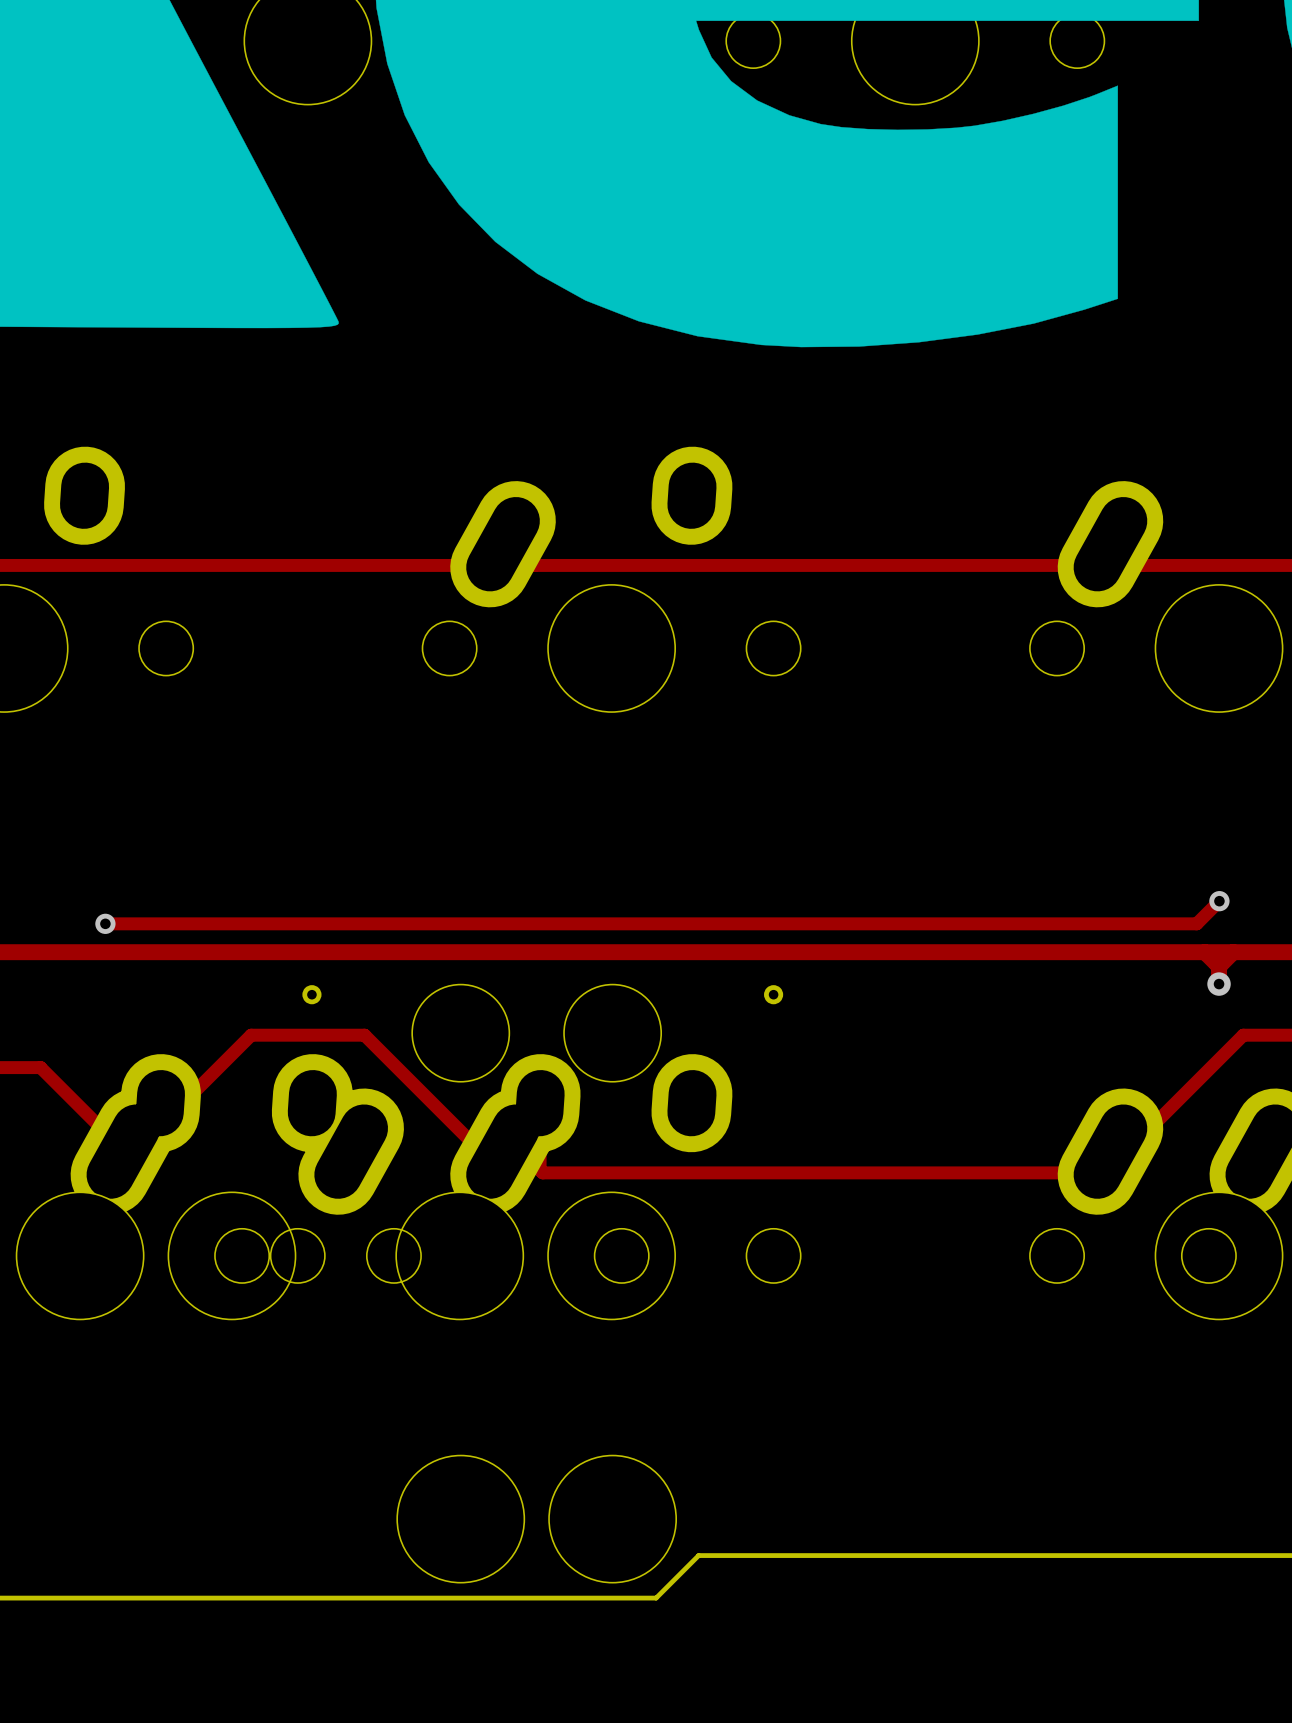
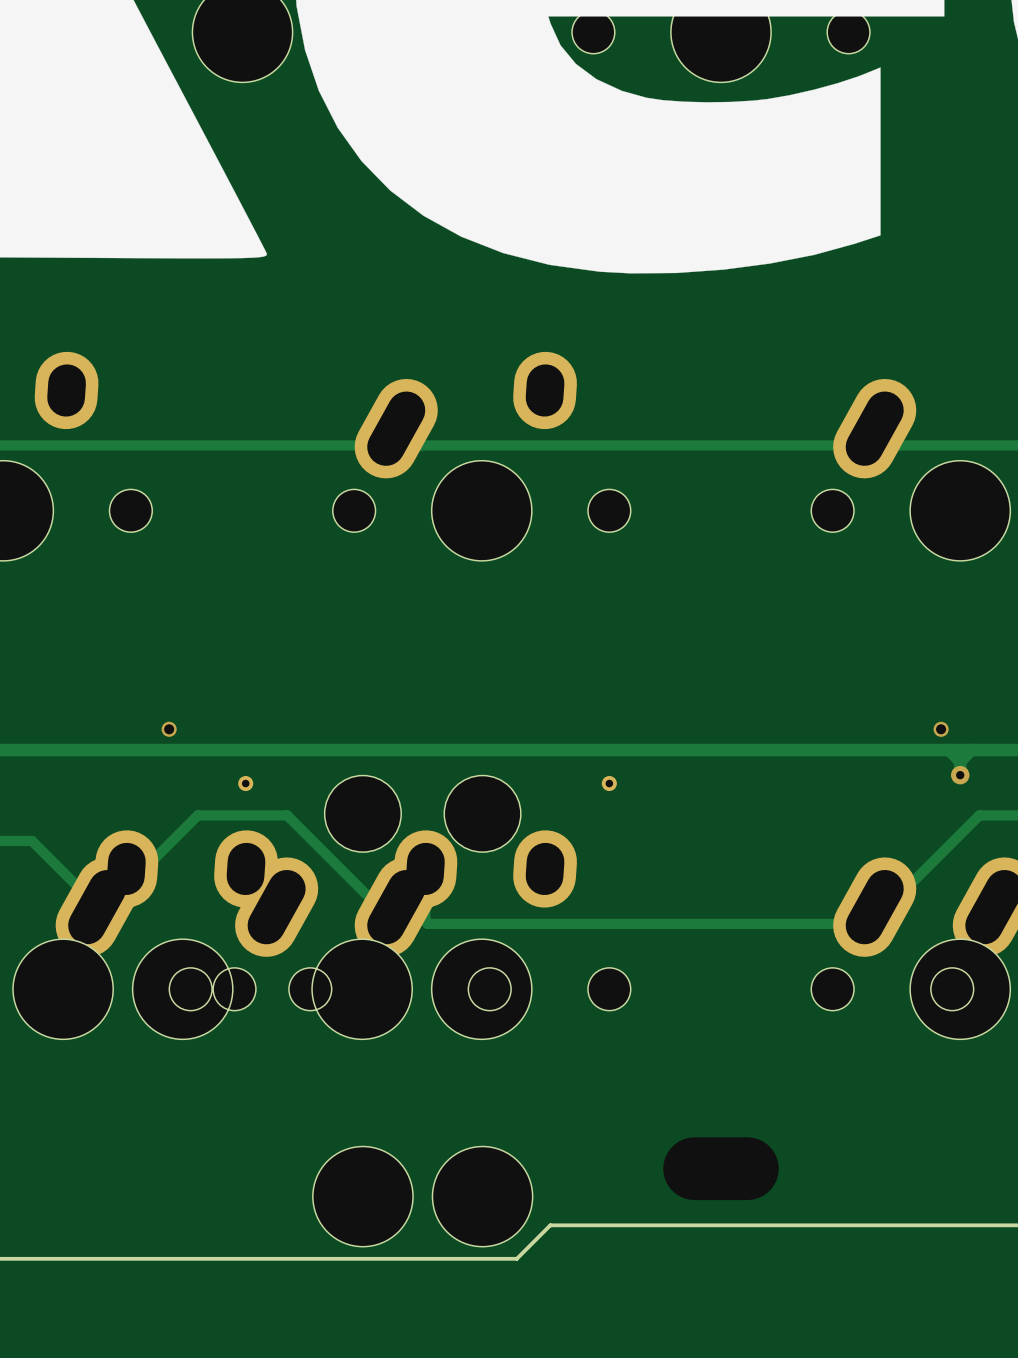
track: (1219, 901) (1196, 923) (105, 923) -> none
via: (1219, 901) -> none
via: (105, 923) -> none
via: none -> (169, 729)
via: none -> (941, 729)

